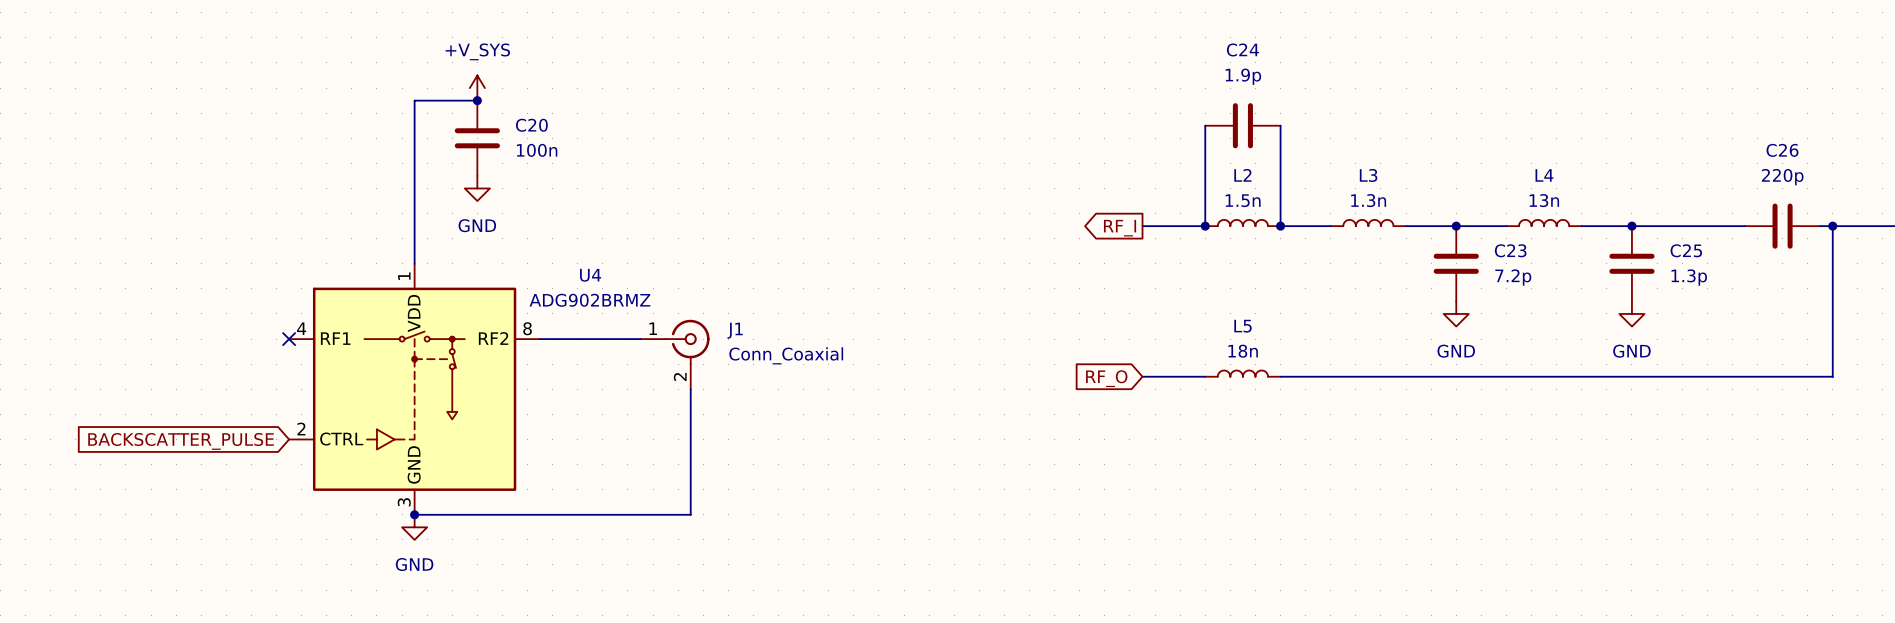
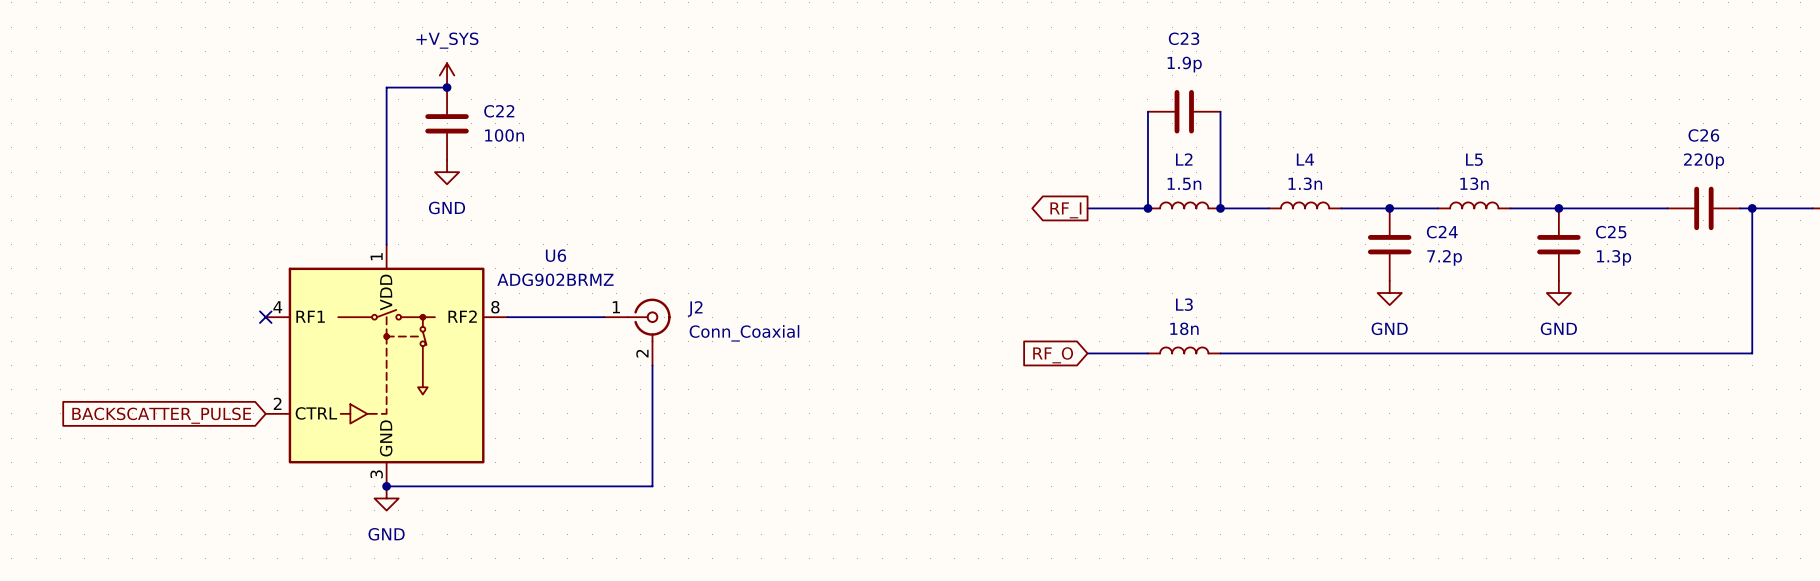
C24 name: C24 (1242, 49) -> C23 (1184, 38)
C20 name: C20 (531, 125) -> C22 (499, 111)
L3 name: L3 (1368, 175) -> L4 (1305, 159)
L4 name: L4 (1544, 175) -> L5 (1474, 159)
C23 name: C23 (1510, 250) -> C24 (1442, 232)
U4 name: U4 (590, 275) -> U6 (556, 255)
L5 name: L5 (1243, 326) -> L3 (1184, 304)
J1 name: J1 (735, 330) -> J2 (695, 308)

